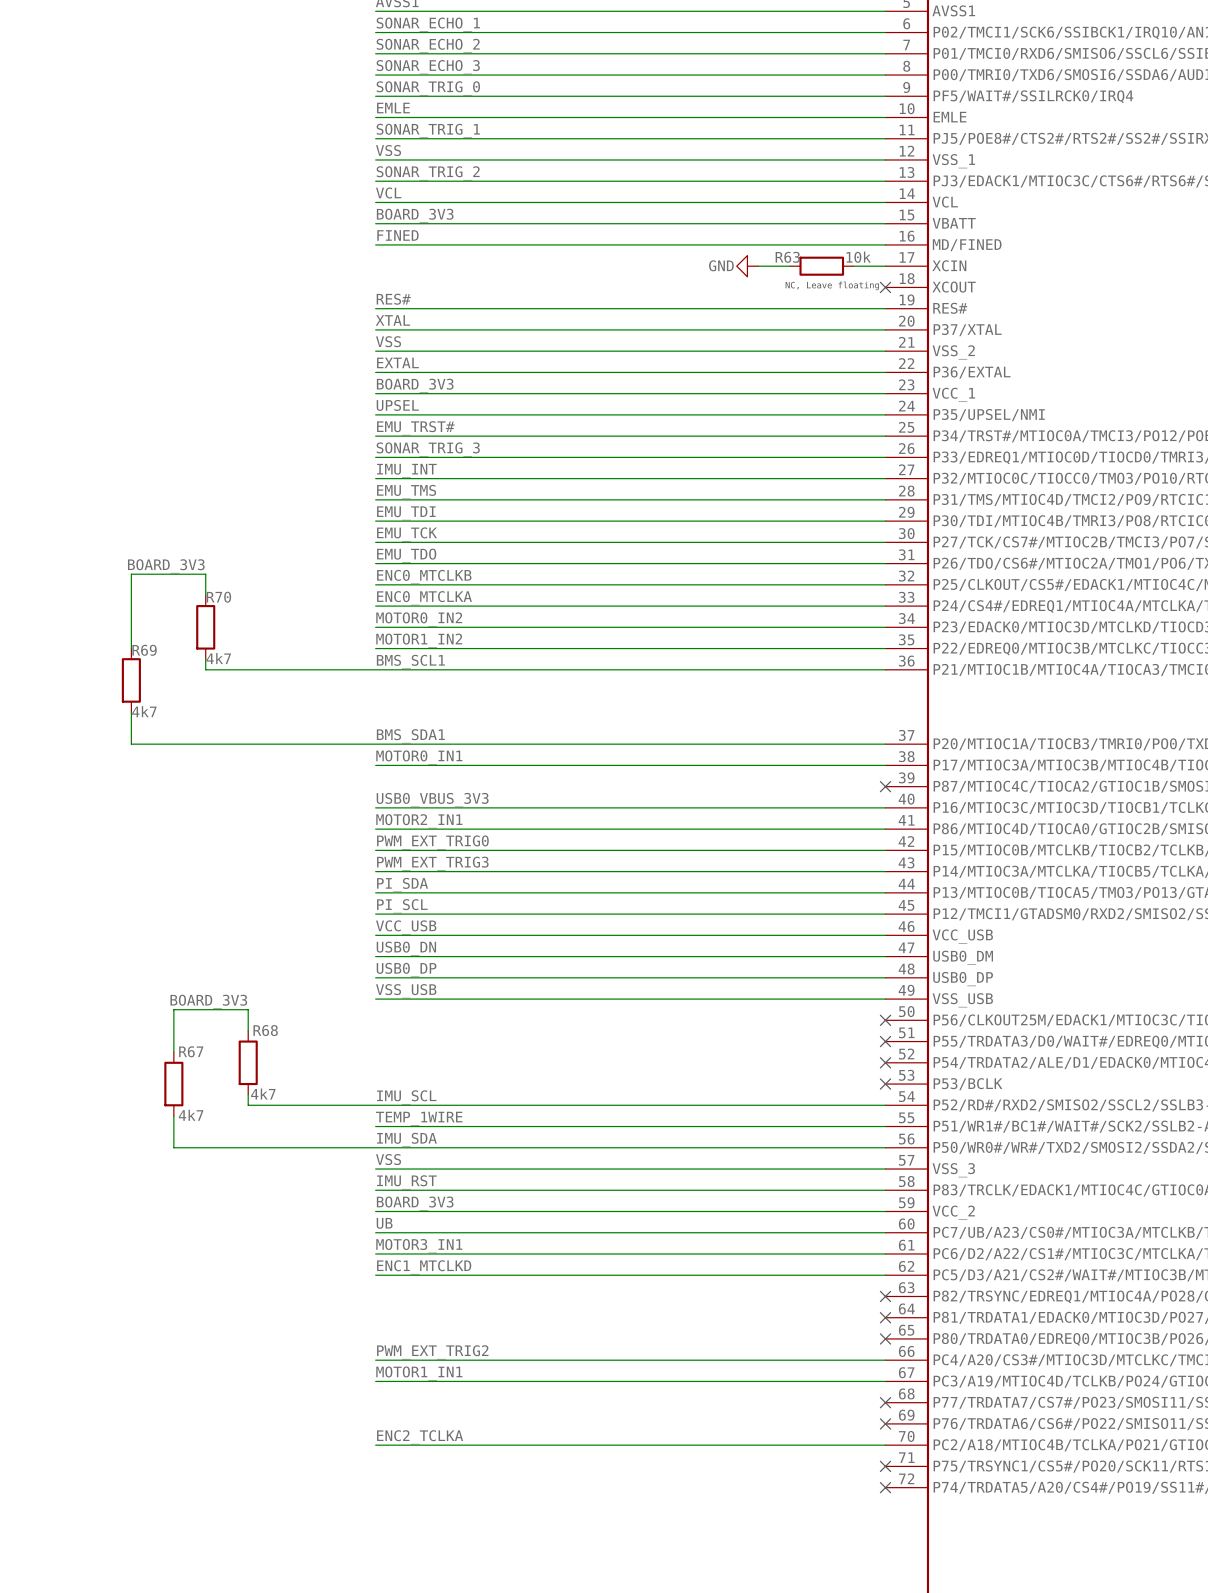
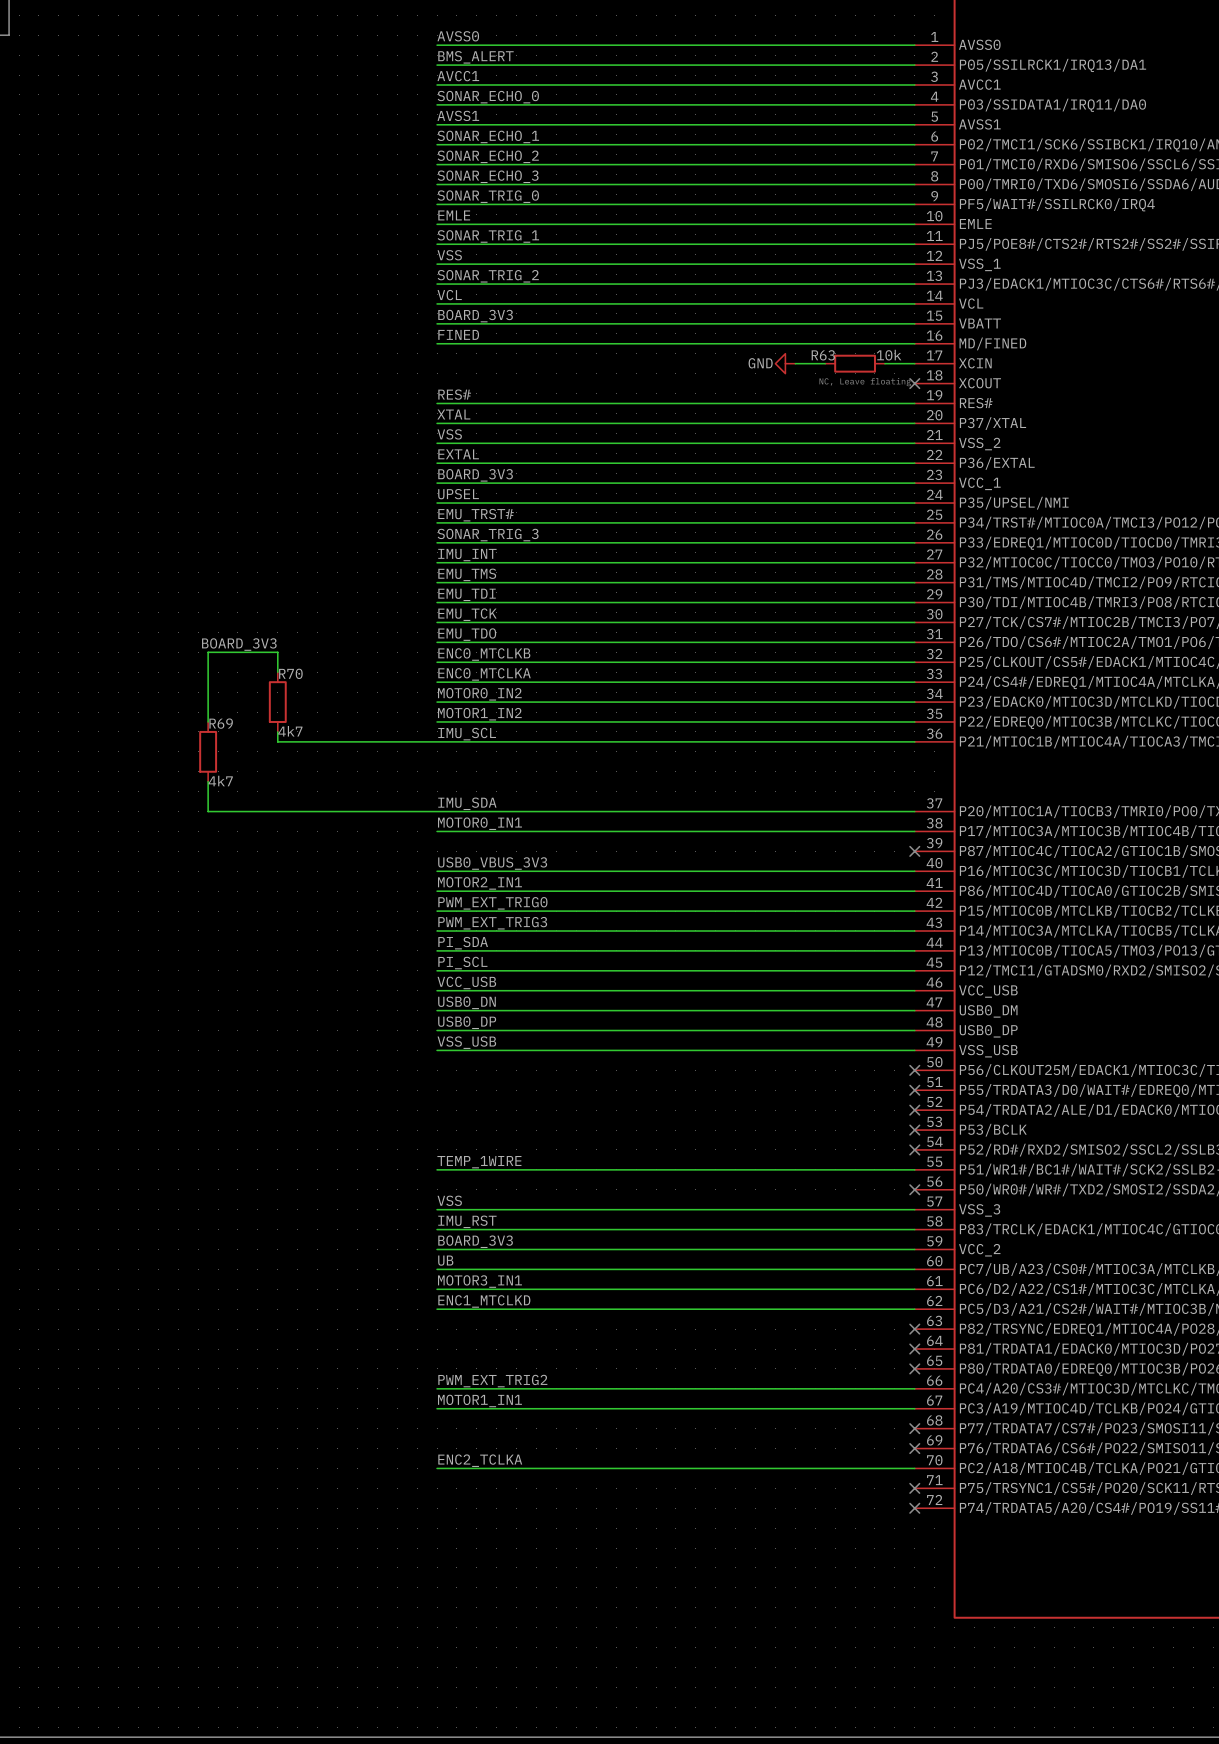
label: BMS_SCL1 (410, 661) -> IMU_SCL (467, 734)
label: BMS_SDA1 (410, 736) -> IMU_SDA (467, 803)
label: BOARD_3V3 (208, 1001) -> none
wire: (248, 1030) (248, 1009) (173, 1009) (173, 1052) -> none
R68: 4k7 (248, 1062) -> none
R67: 4k7 (173, 1084) -> none
wire: (248, 1094) (248, 1105) (885, 1105) -> none
label: IMU_SCL (406, 1097) -> none
no-connect mark: none -> (914, 1149)
wire: (173, 1115) (173, 1147) (885, 1147) -> none
label: IMU_SDA (406, 1139) -> none
no-connect mark: none -> (914, 1189)

